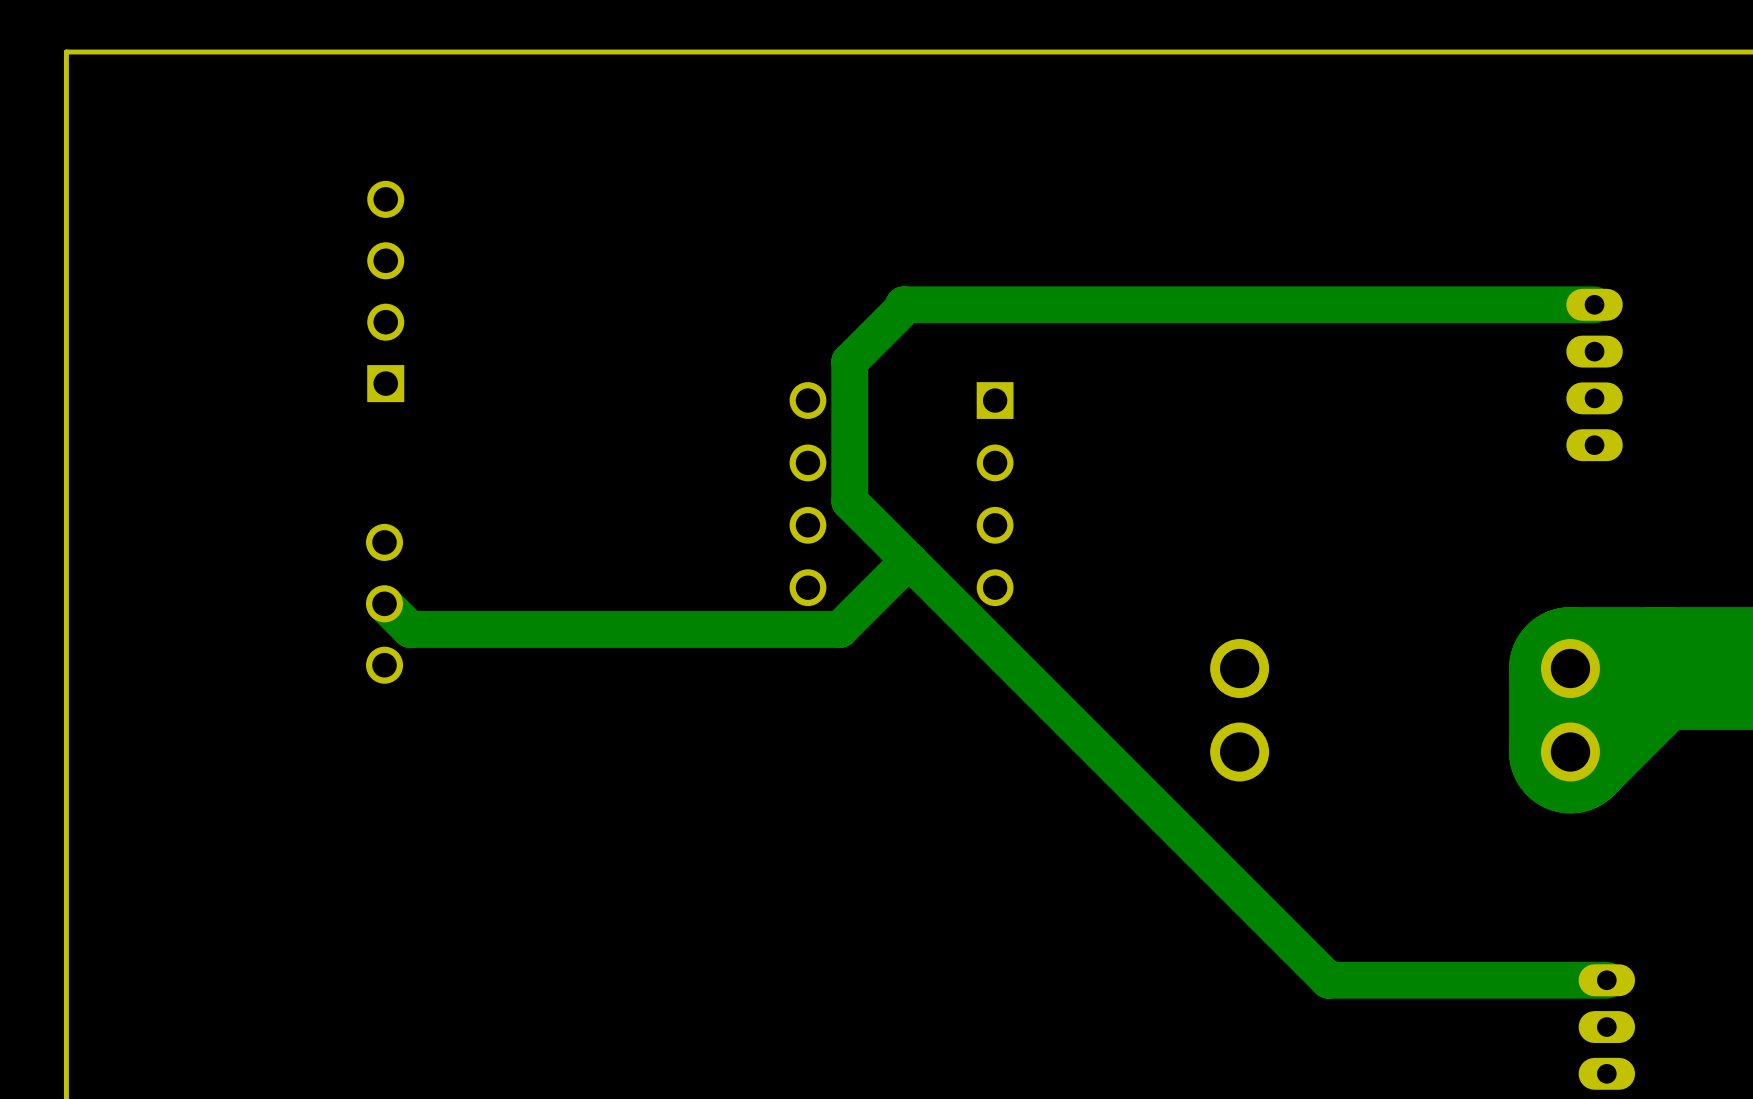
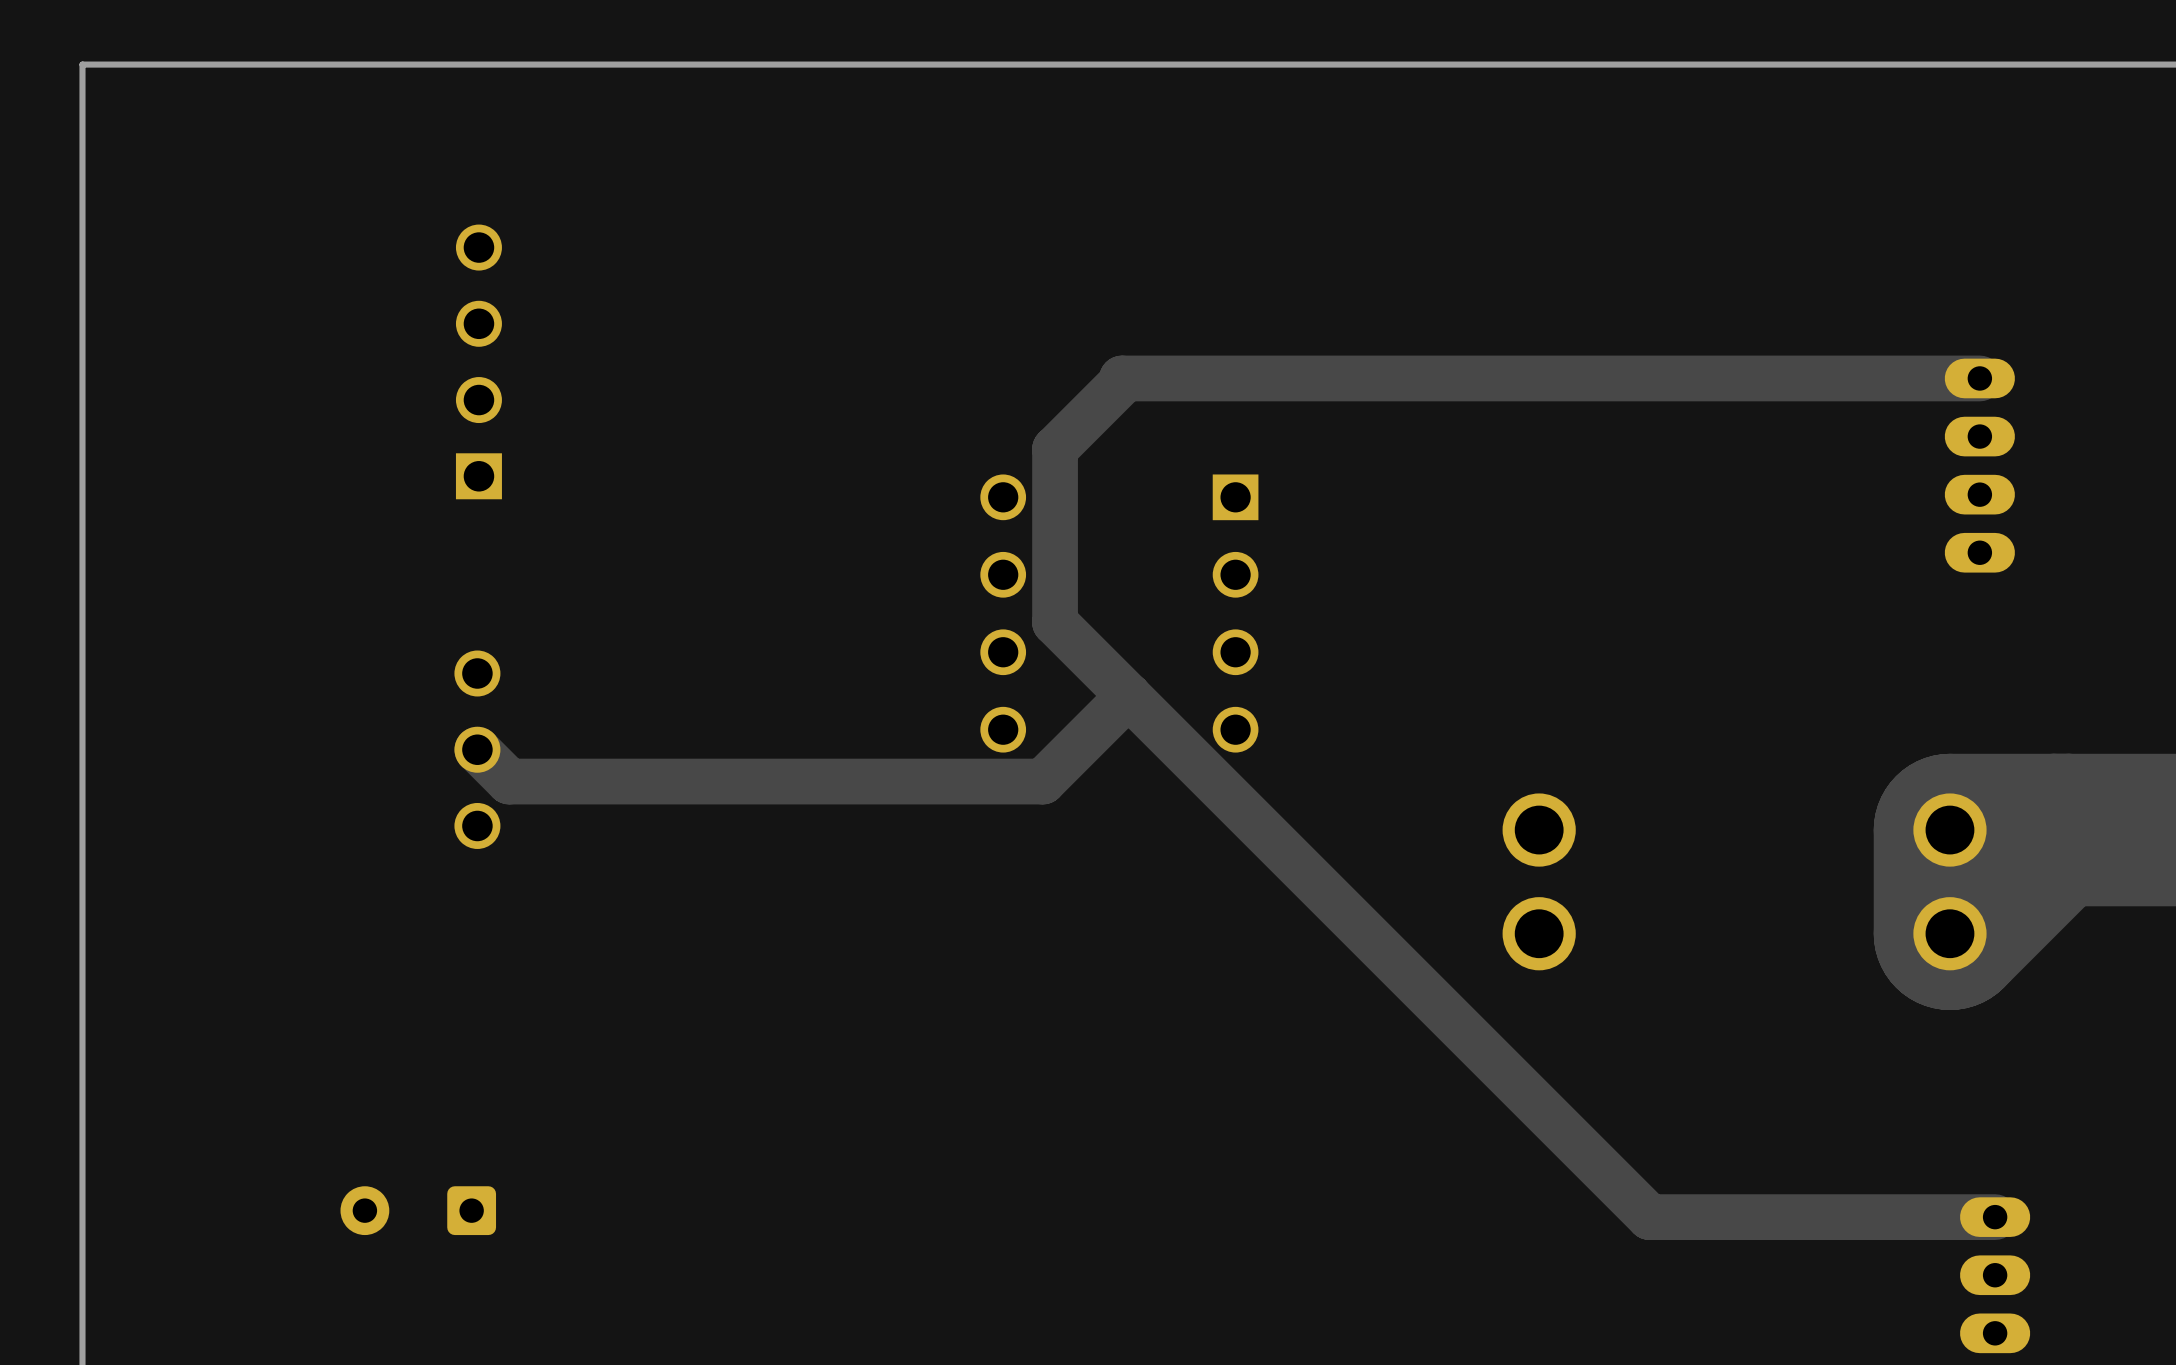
part: none -> (418, 1210)

